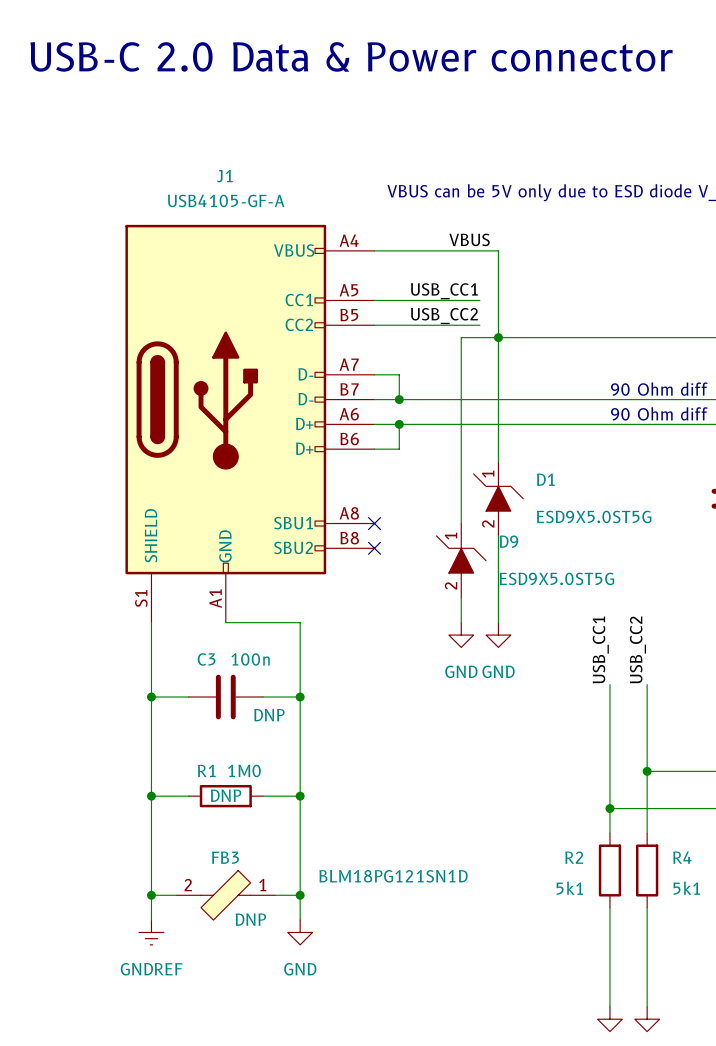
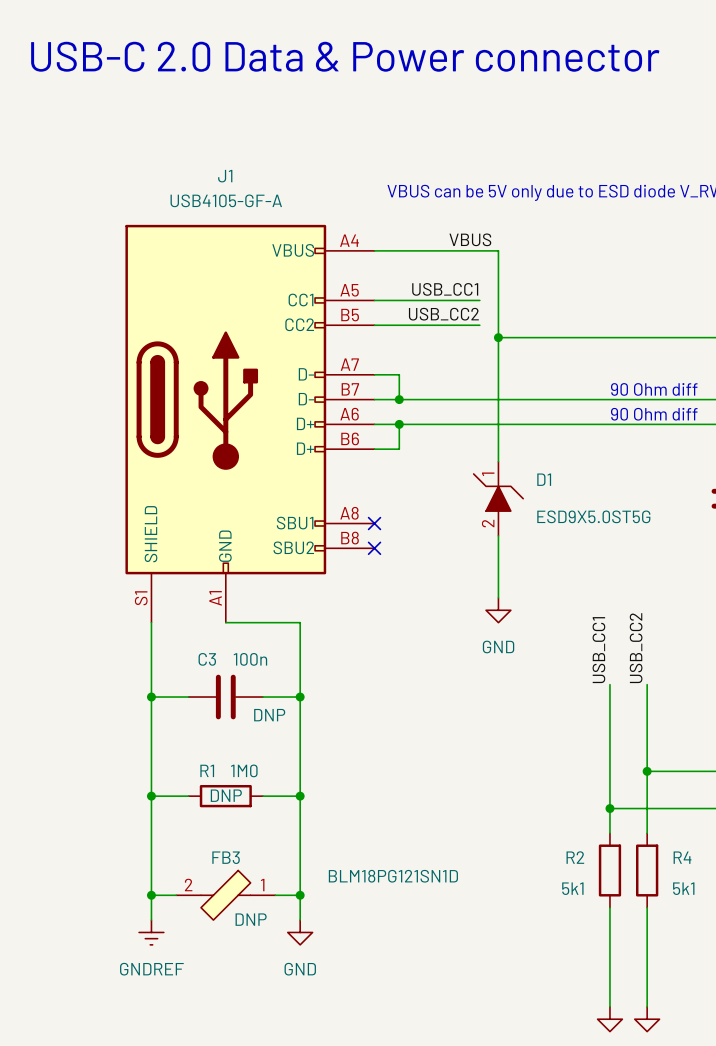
wire: (498, 337) (461, 337) (461, 523) -> none
D9: ESD9X5.0ST5G (461, 560) -> none
wire: (461, 597) (461, 622) -> none
power symbol: none -> GND (498, 610)
power symbol: GND (461, 635) -> none
power symbol: GND (498, 635) -> none

